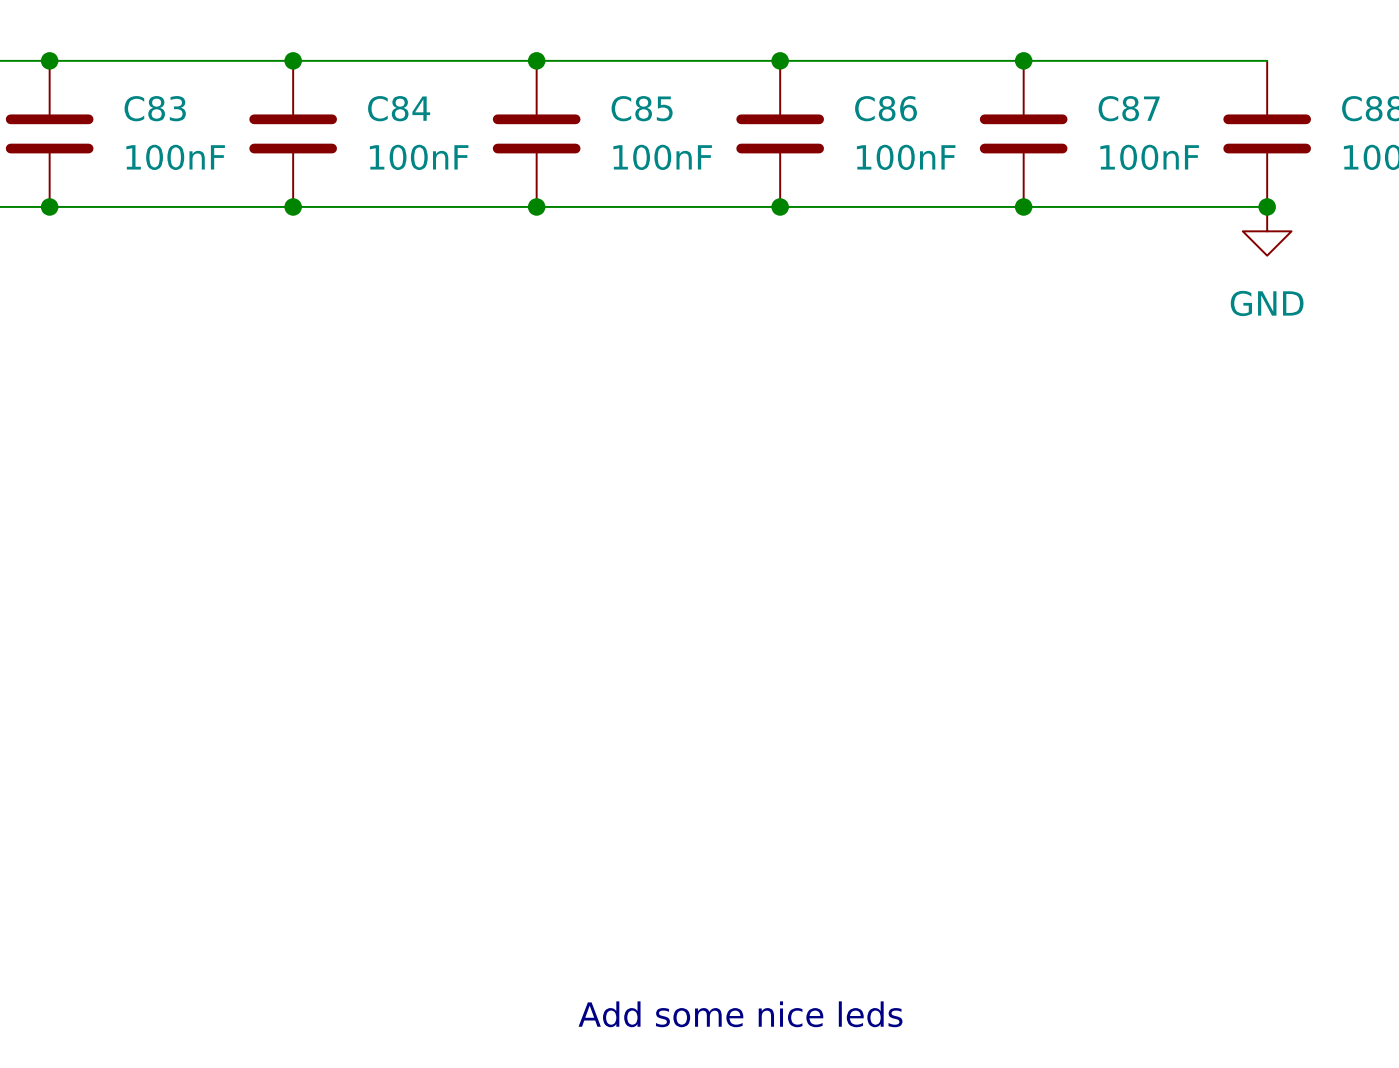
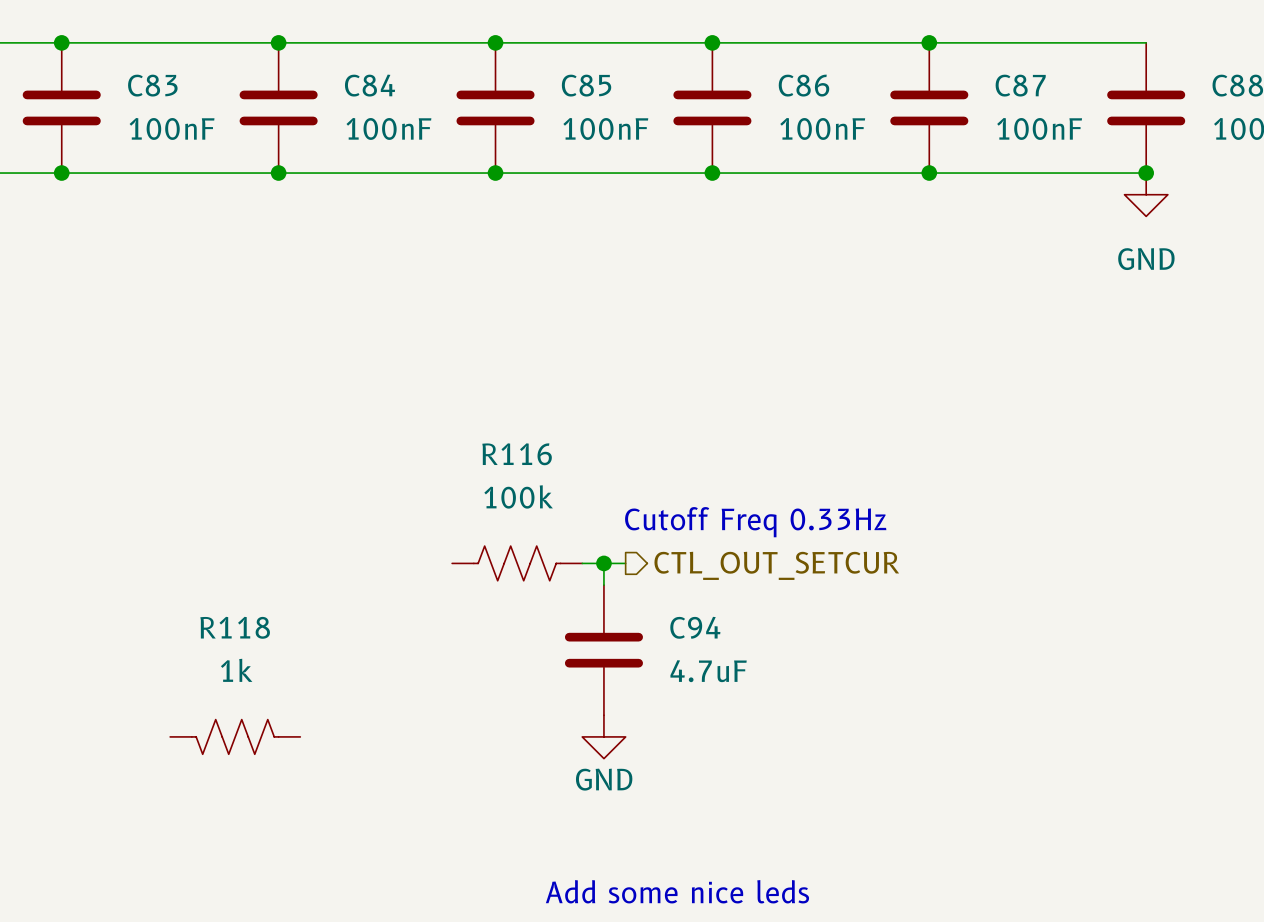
text: none -> Cutoff Freq 0.33Hz (755, 522)
R116: none -> 100k (517, 563)
wire: none -> (582, 563) (625, 563)
wire: none -> (603, 563) (603, 585)
junction: none -> (603, 563)
hierarchical label: none -> CTL_OUT_SETCUR (776, 565)
C94: none -> 4.7uF (603, 650)
R118: none -> 1k (235, 736)
power symbol: none -> GND (603, 736)

